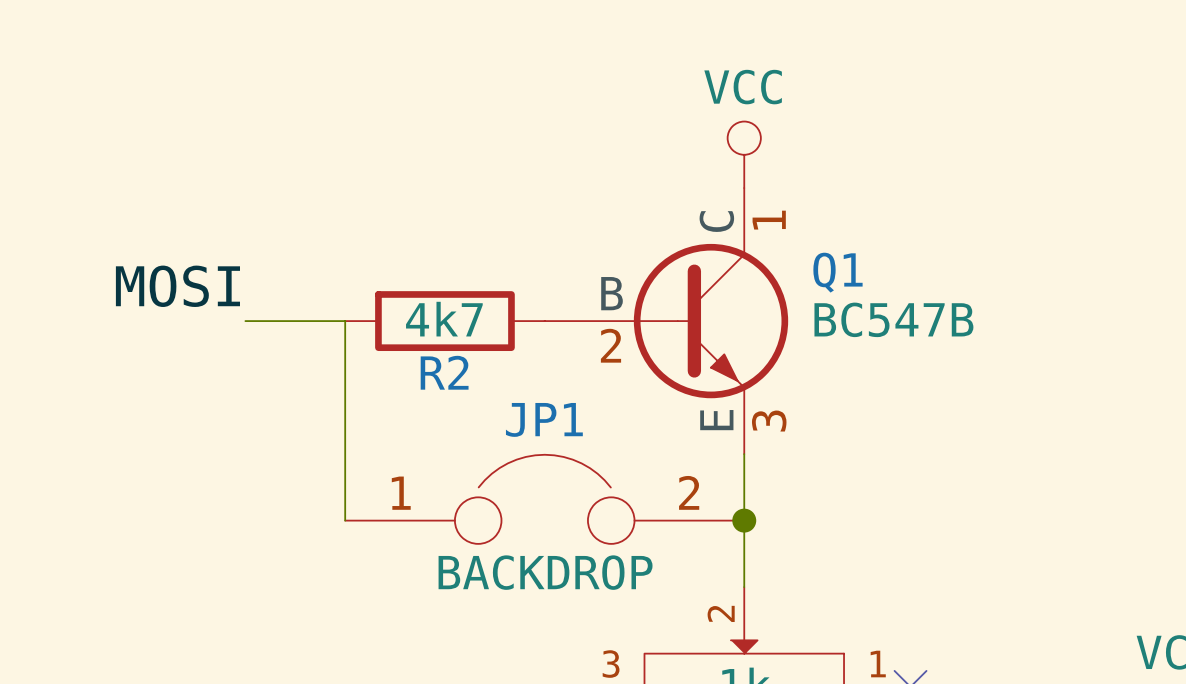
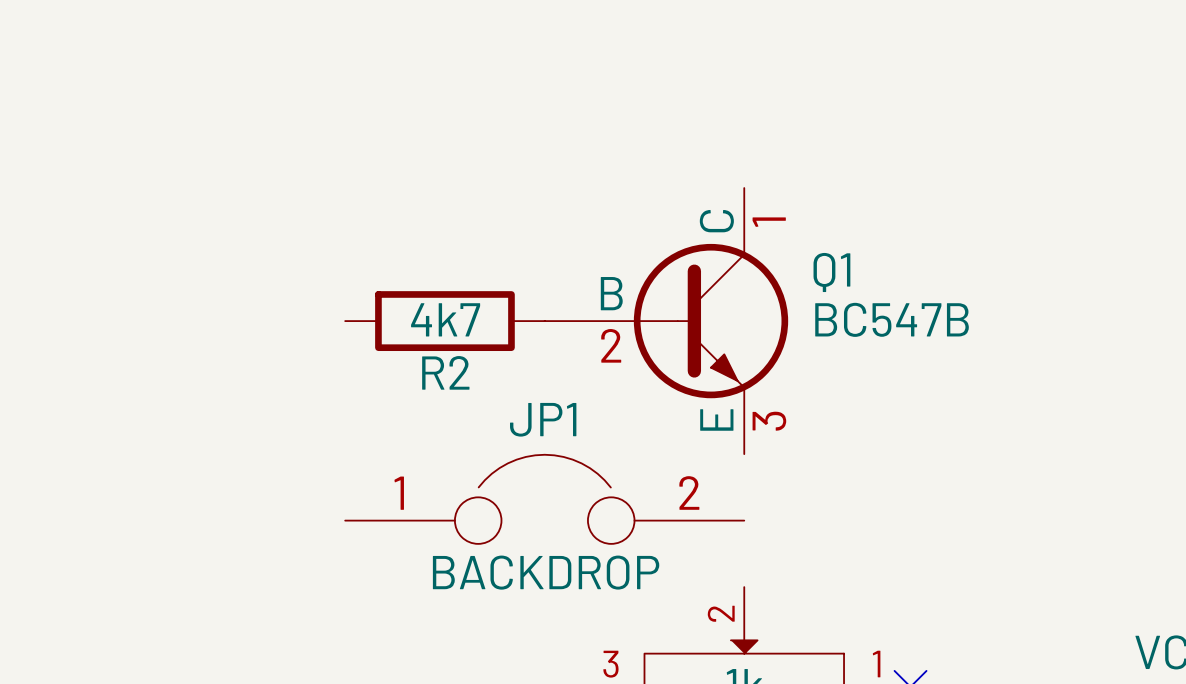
power symbol: VCC (744, 154) -> none
label: MOSI (177, 286) -> none
wire: (245, 321) (345, 321) (345, 520) -> none
wire: (744, 454) (744, 587) -> none
junction: (744, 520) -> none

